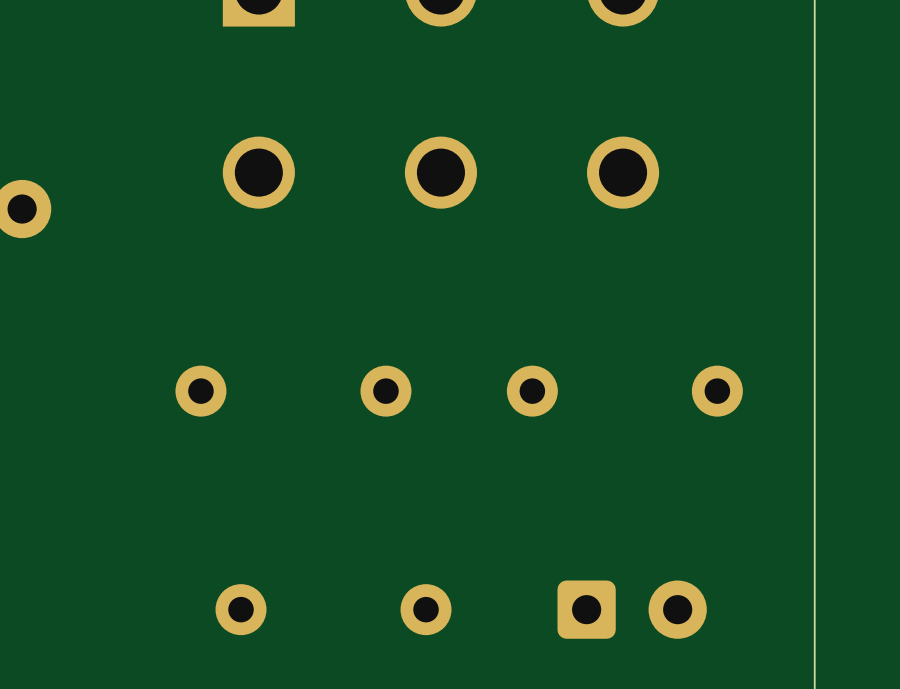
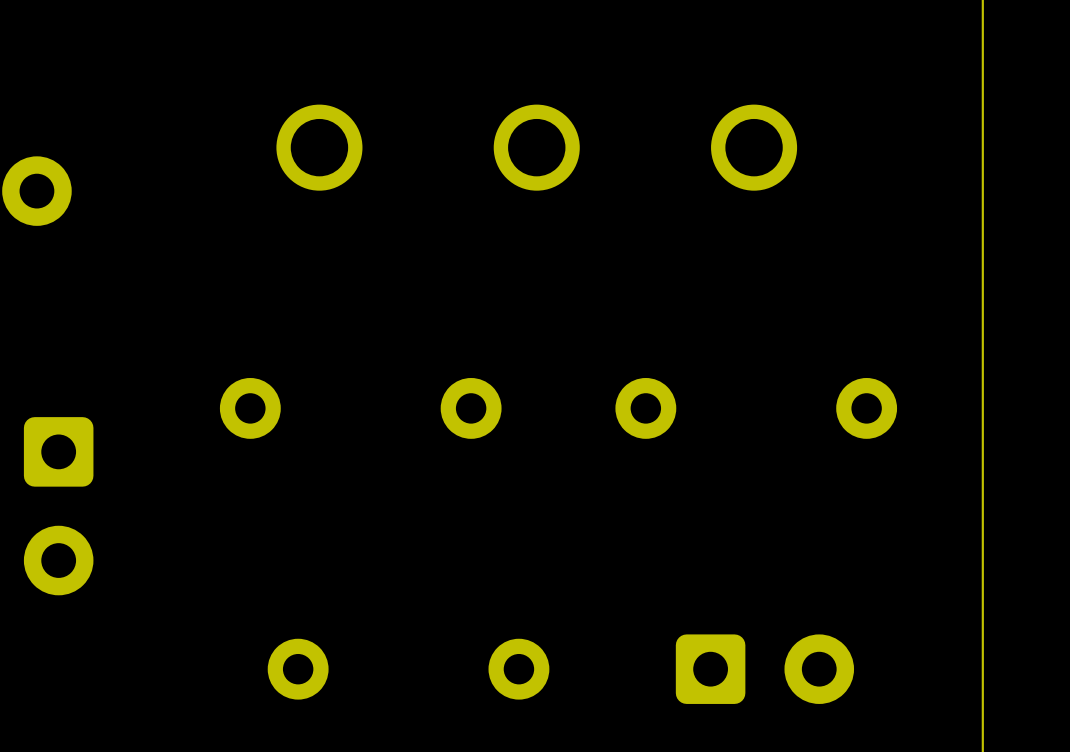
part: none -> (58, 506)

